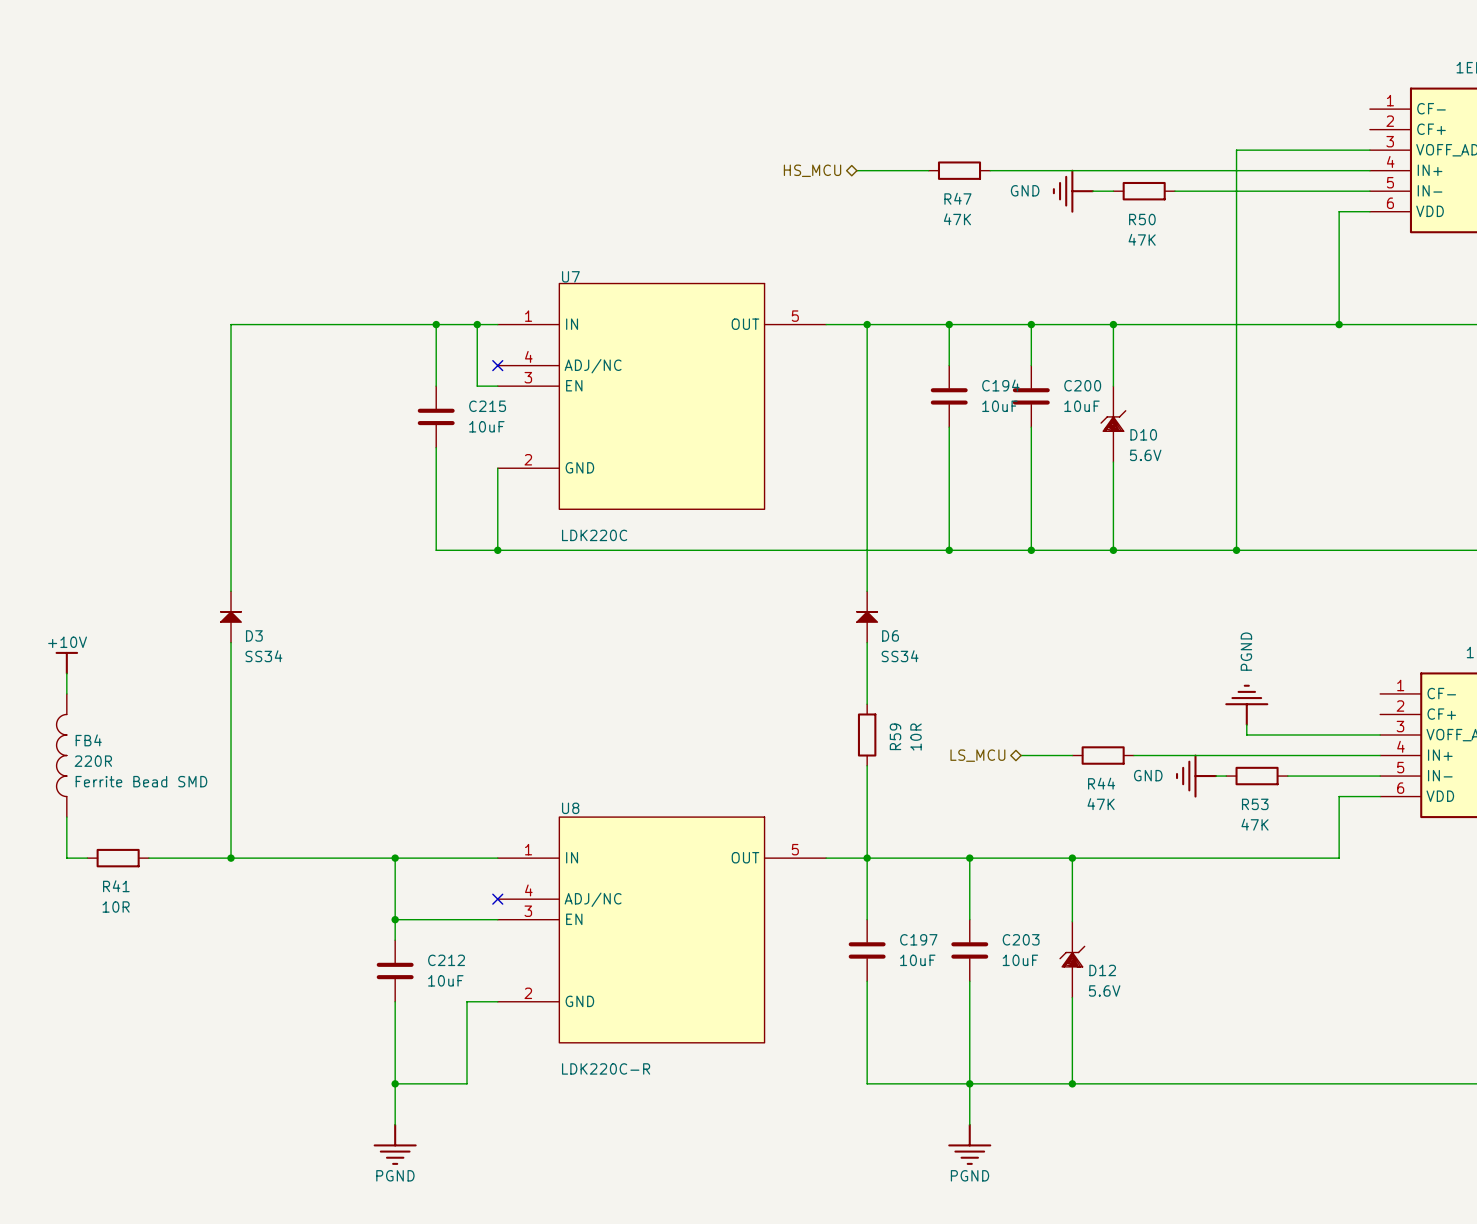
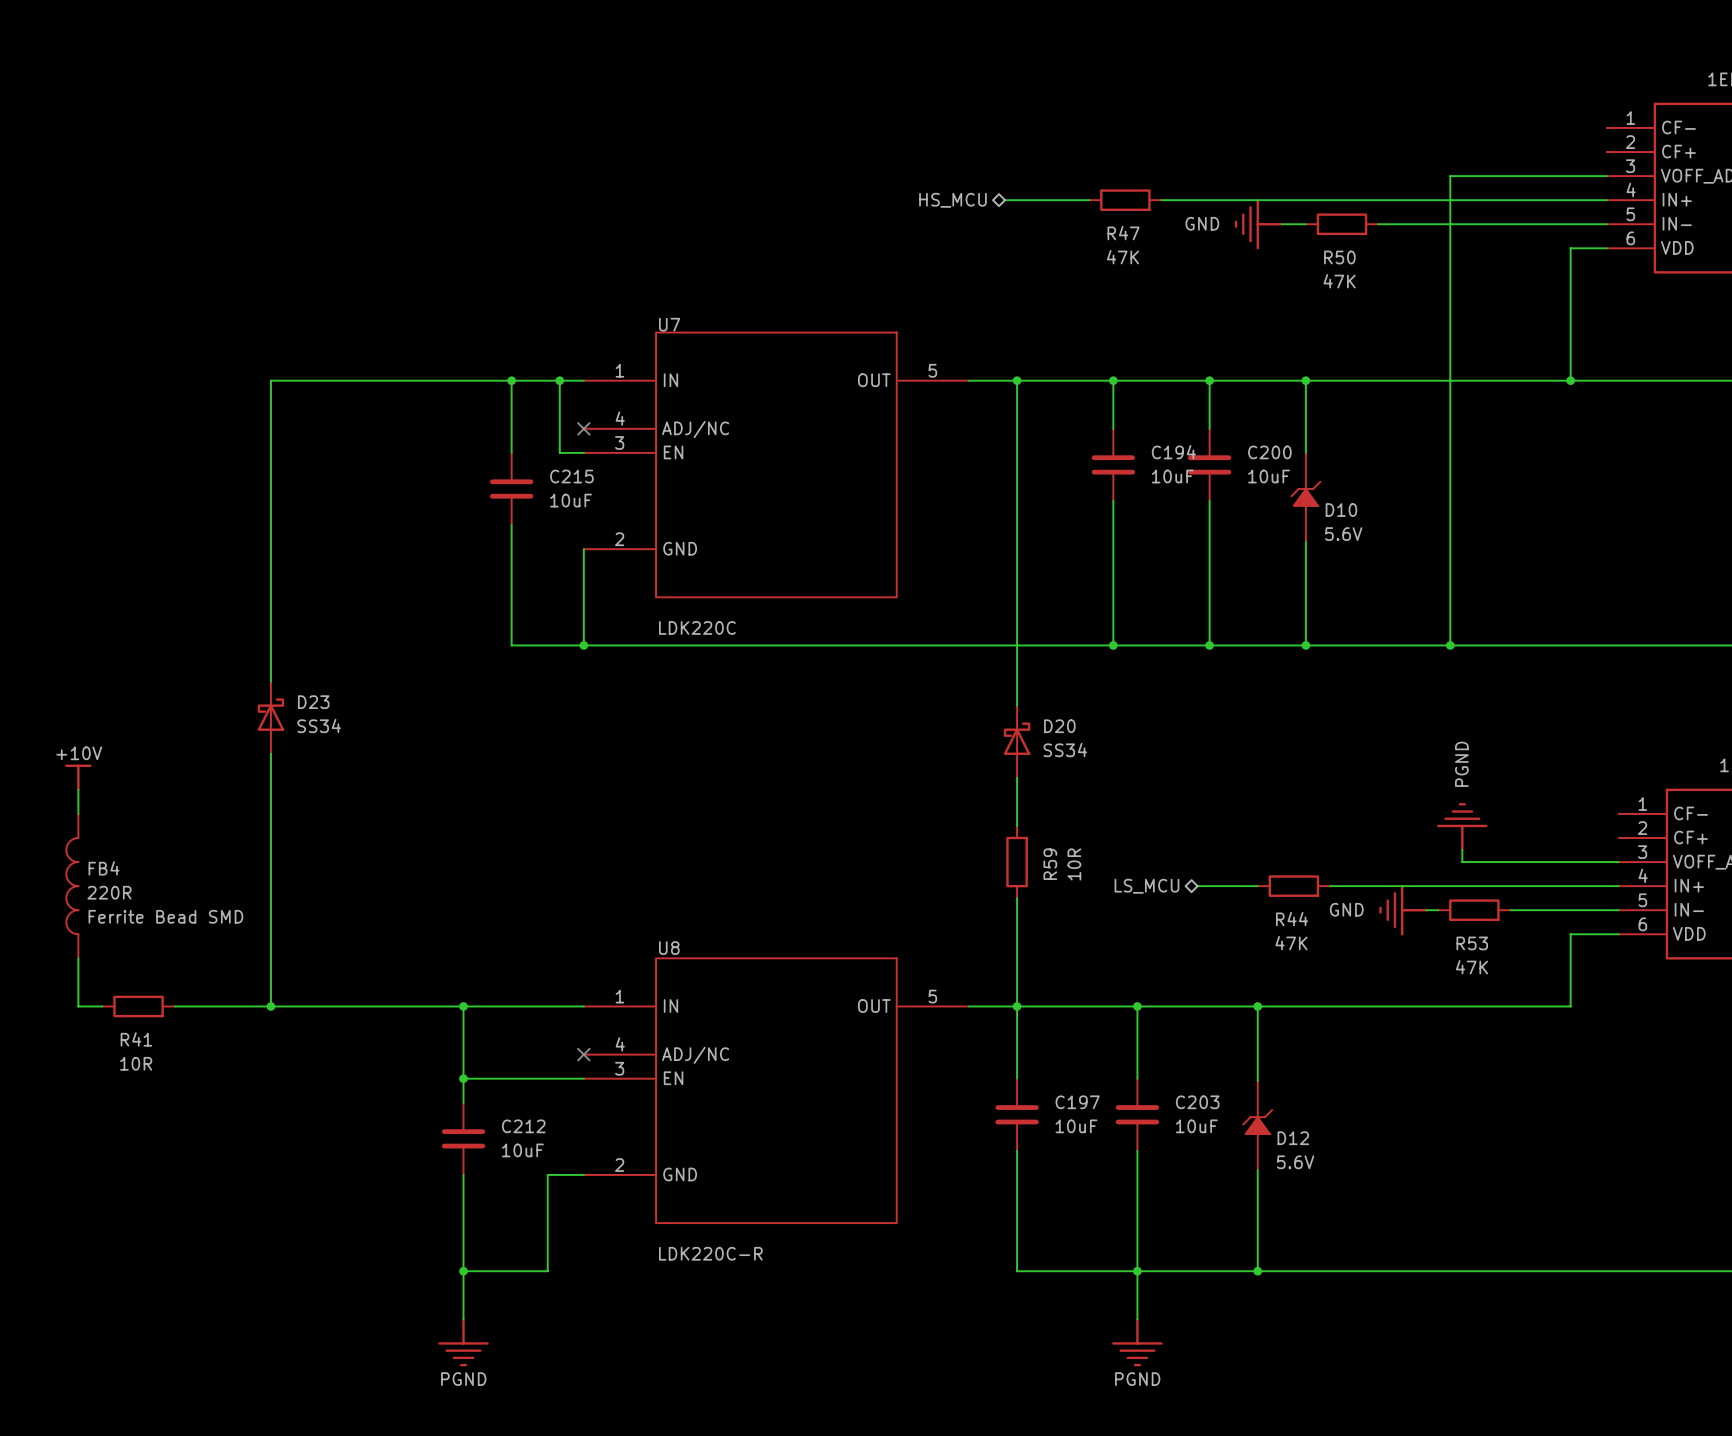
D23: none -> SS34 (270, 717)
D3: SS34 (231, 617) -> none
D6: SS34 (867, 617) -> none
D20: none -> SS34 (1017, 741)

